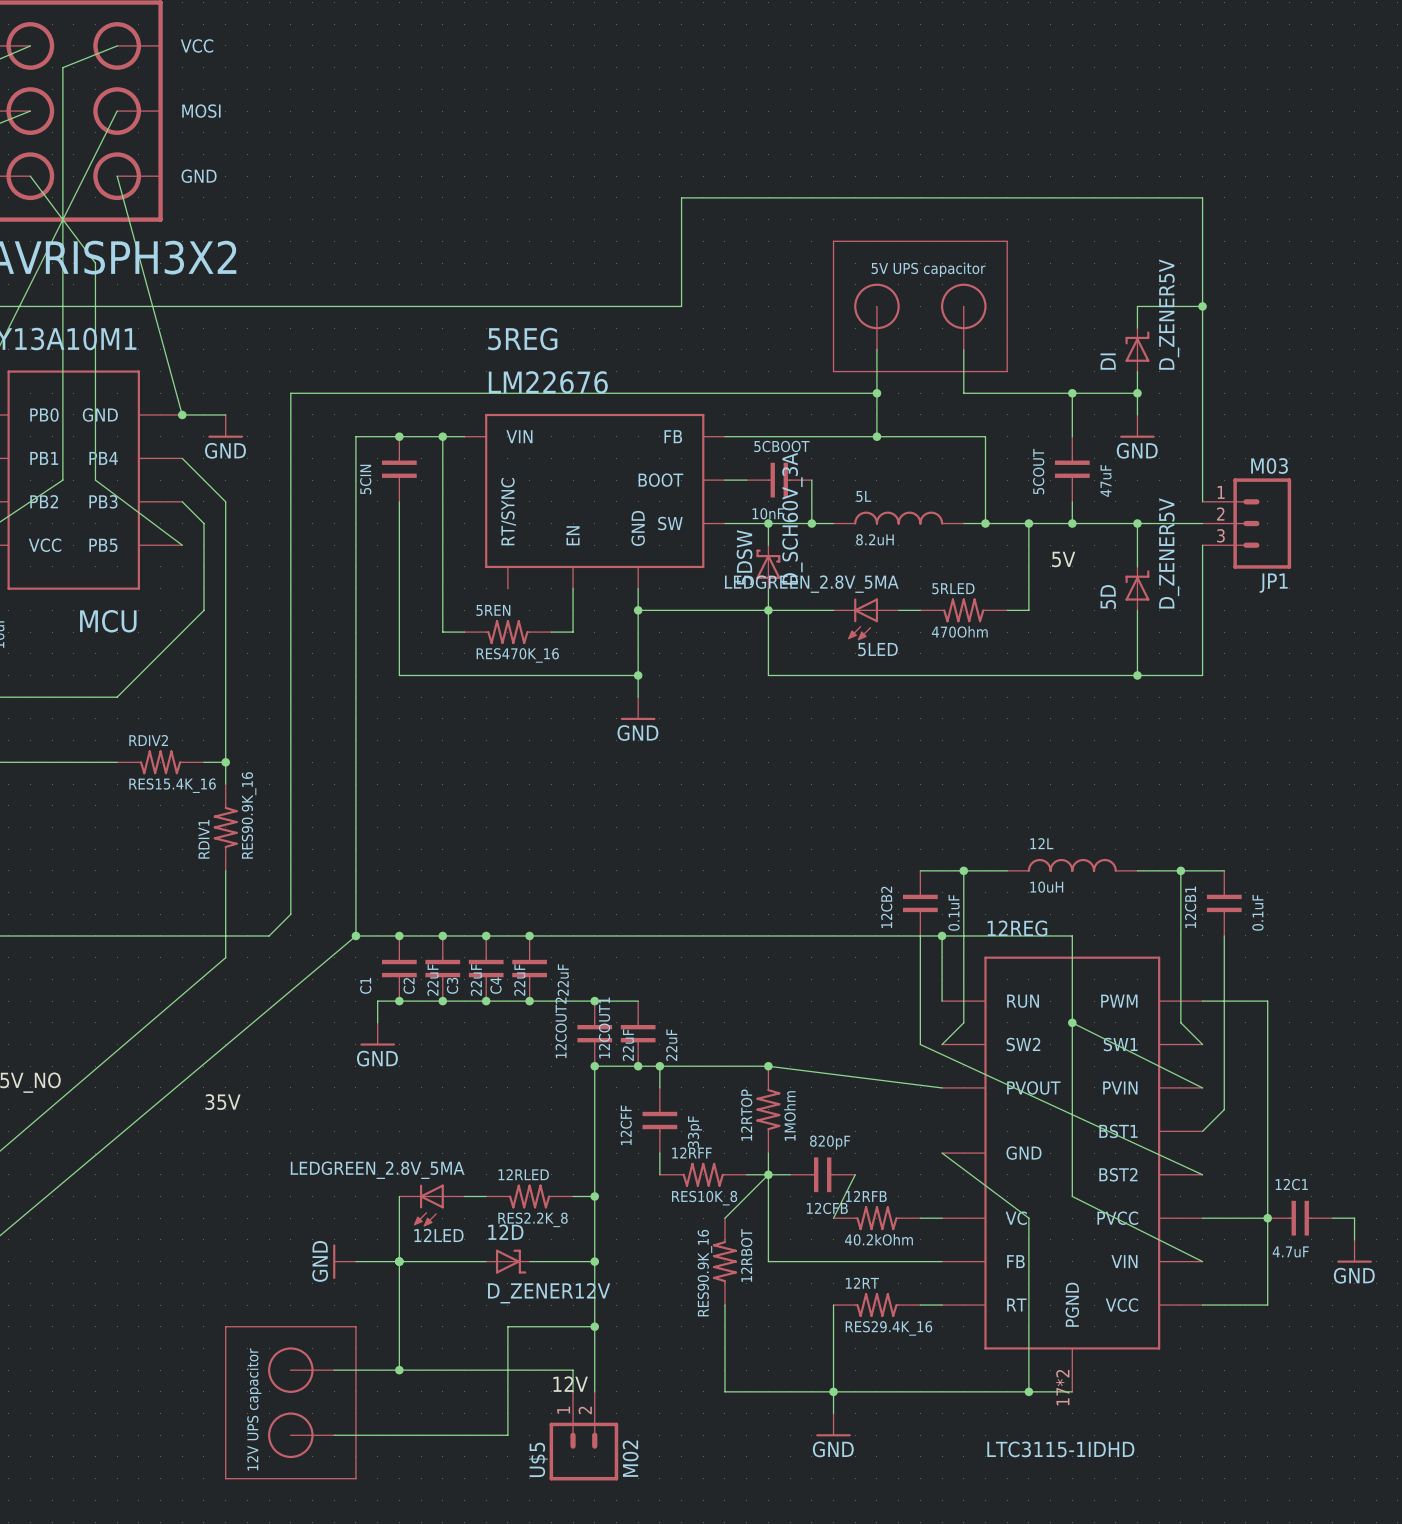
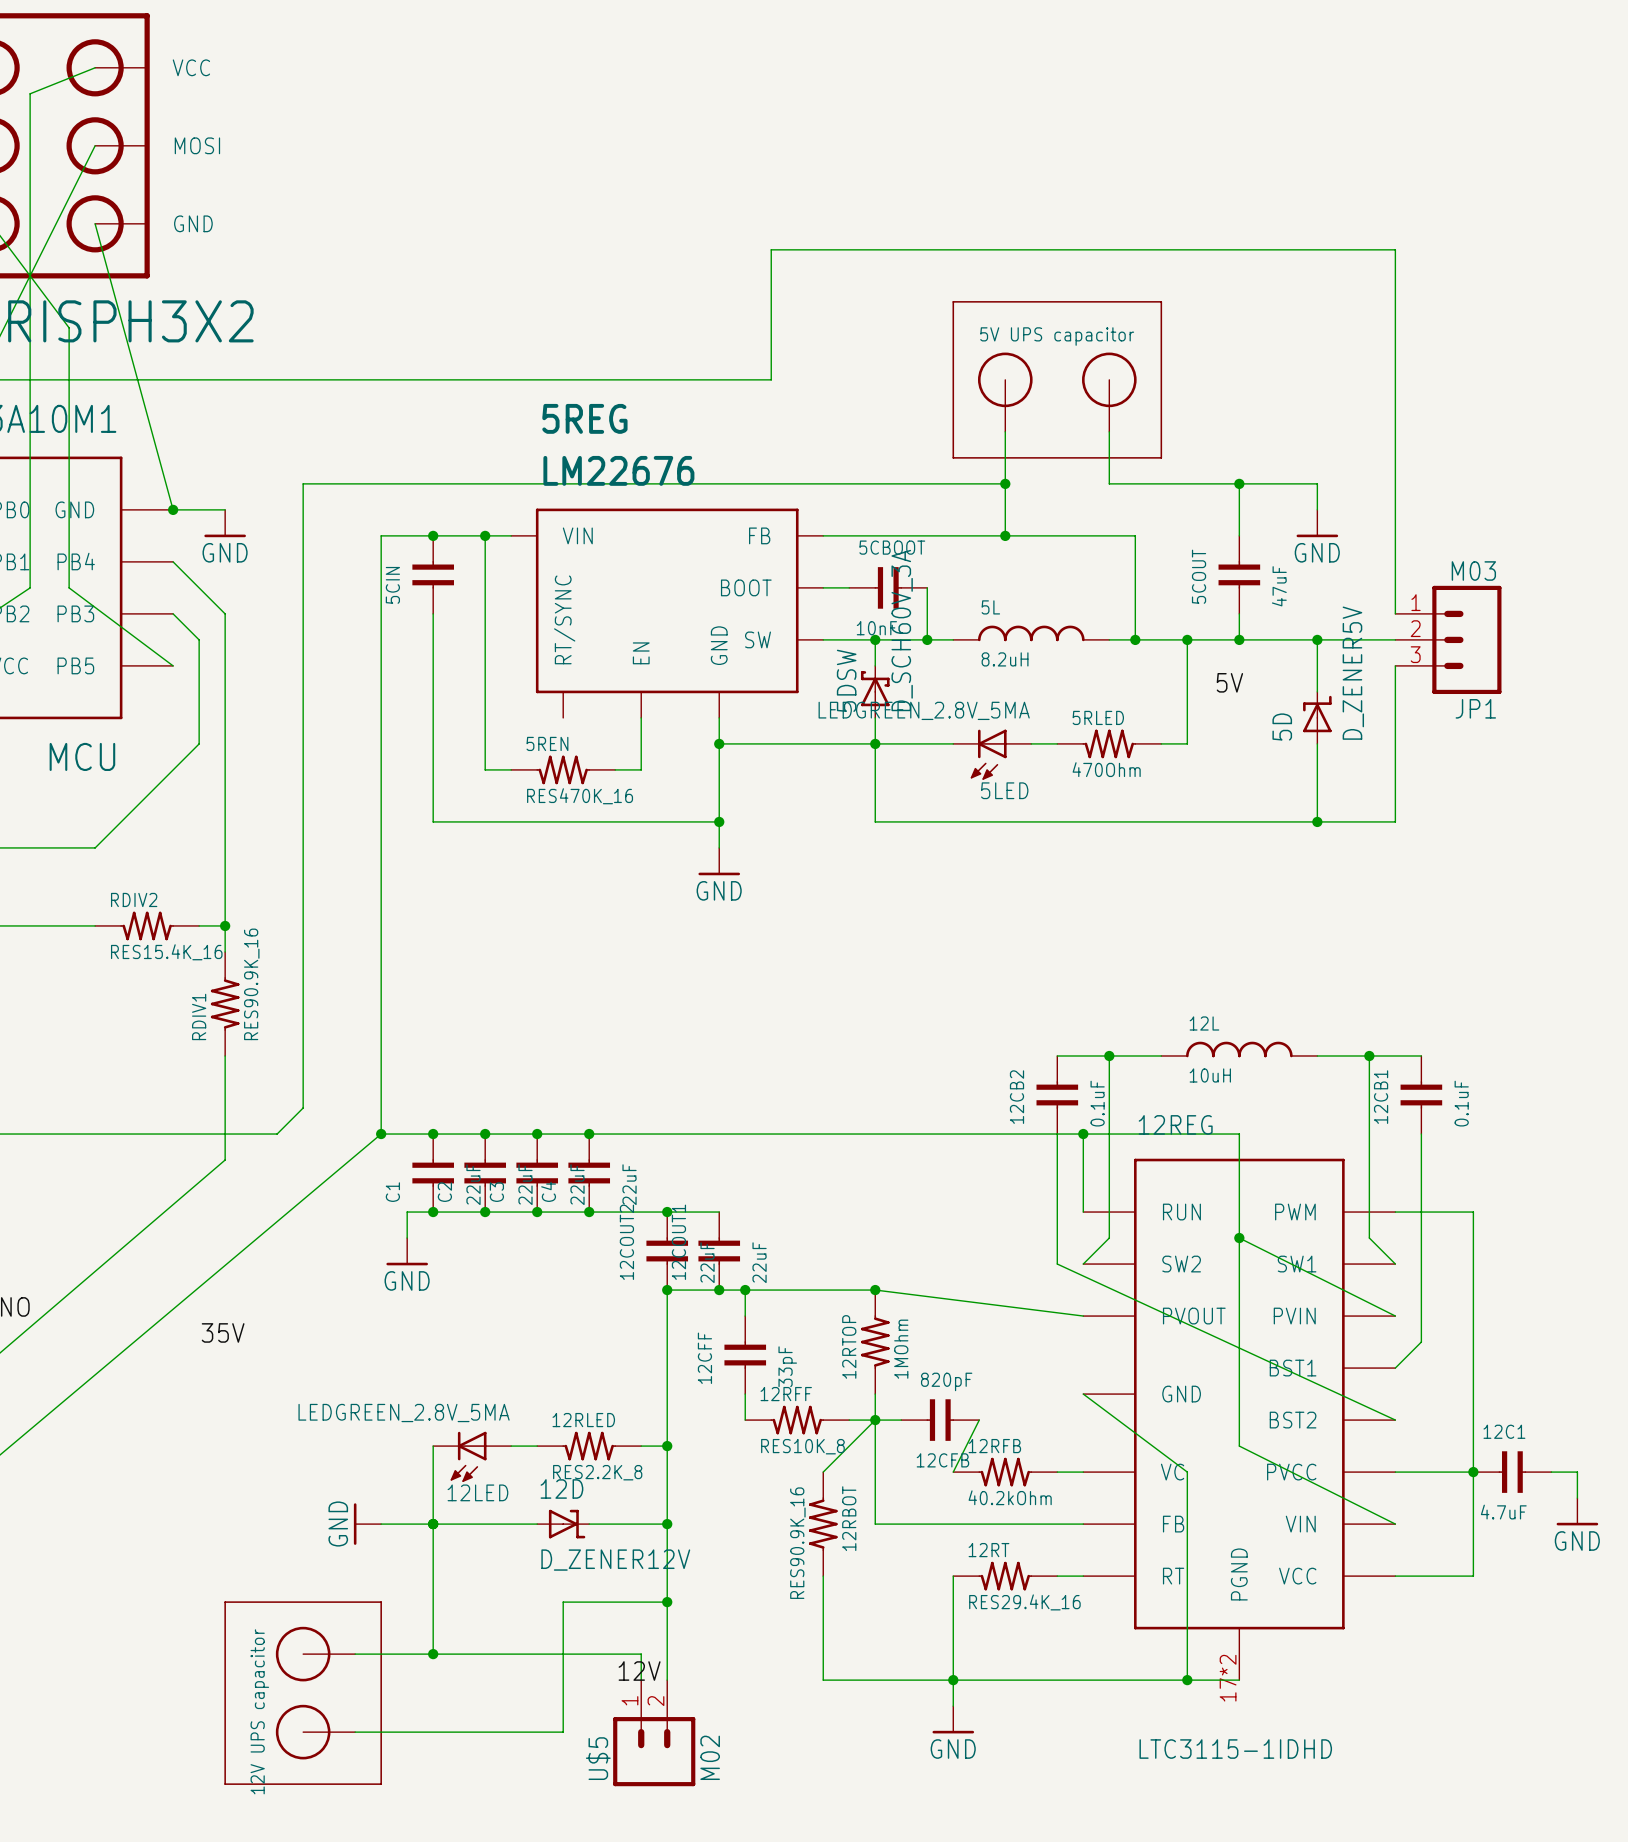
wire: (1202, 306) (1137, 306) (1137, 328) -> none
junction: (1202, 306) -> none
DI: D_ZENER5V (1137, 349) -> none
wire: (1137, 371) (1137, 393) -> none
junction: (1137, 393) -> none

